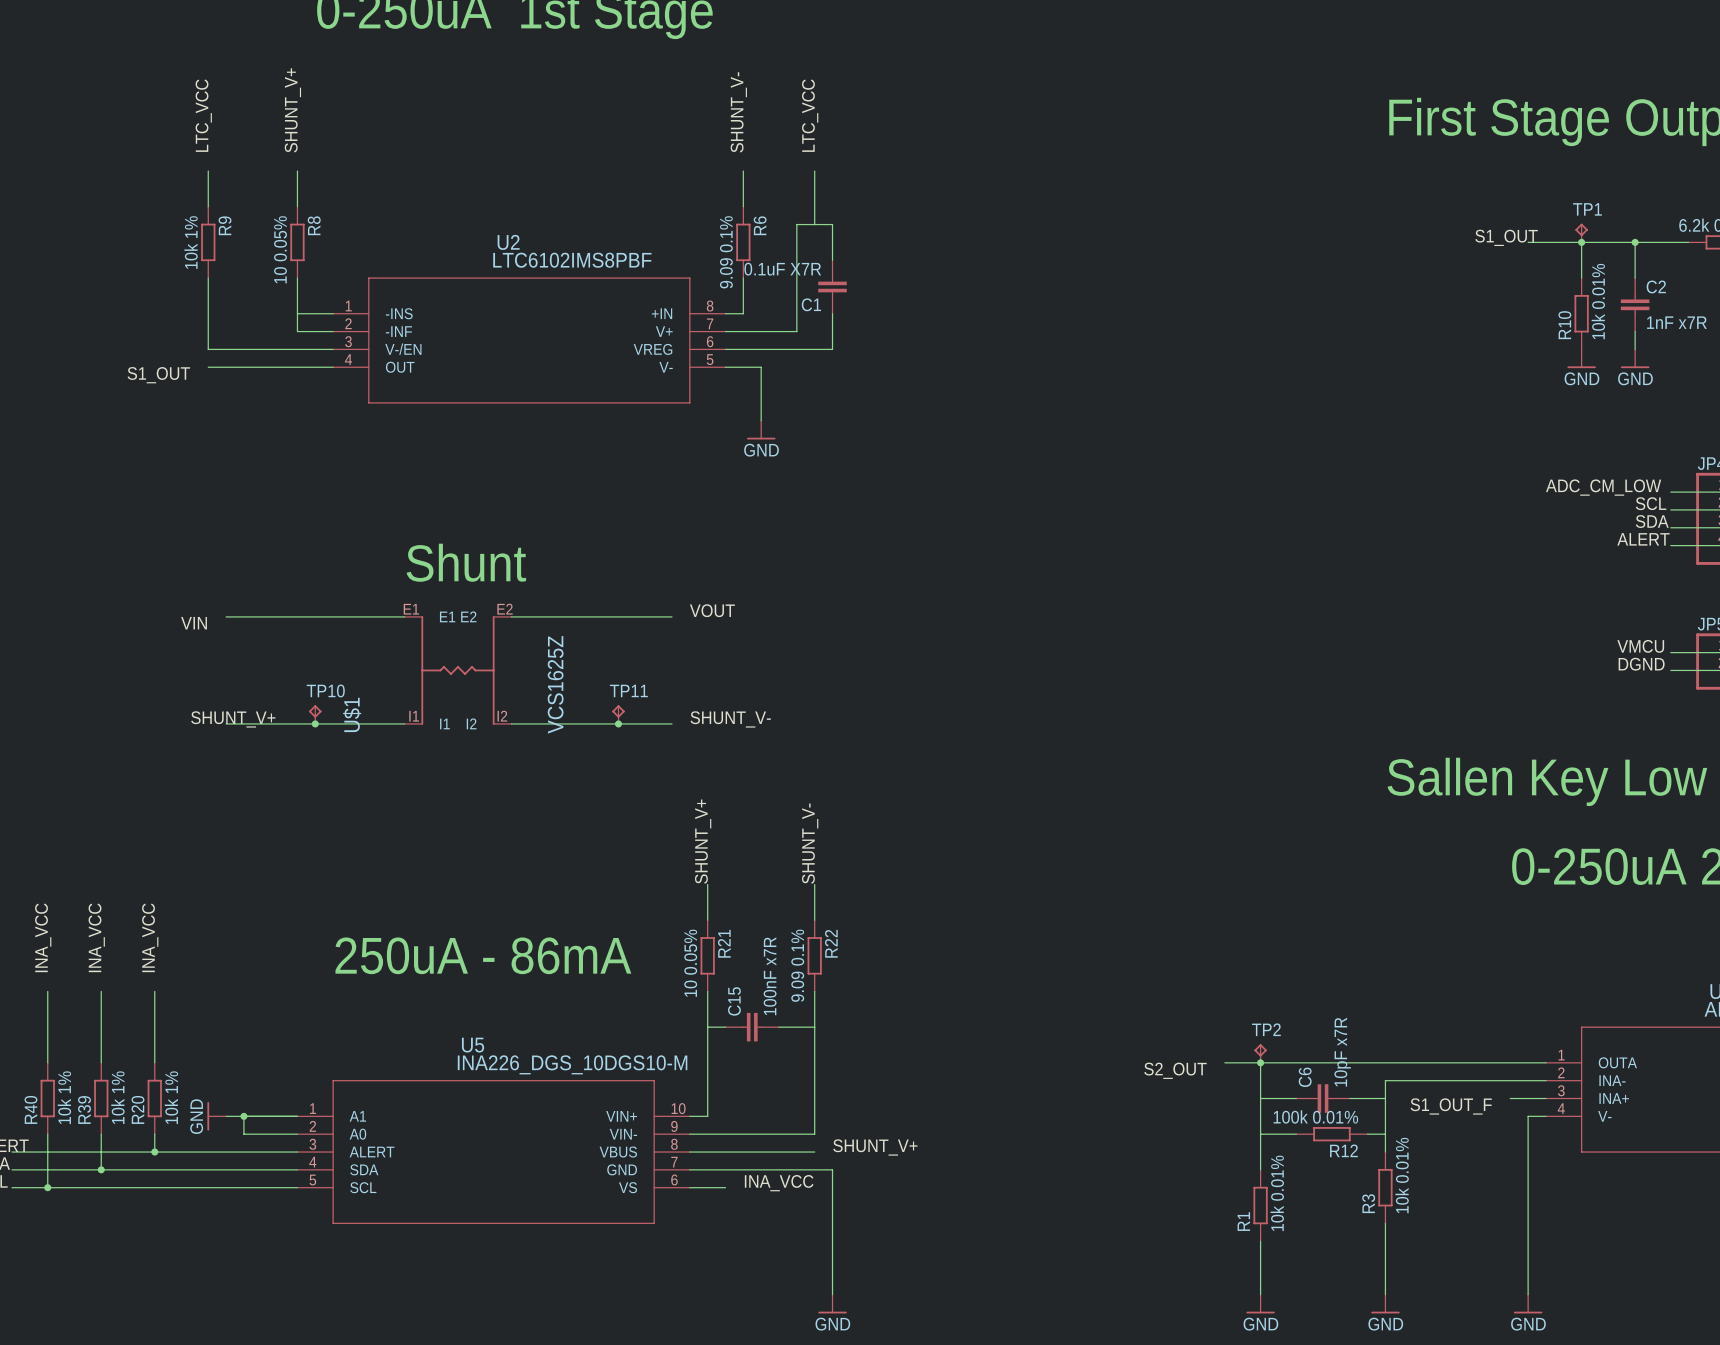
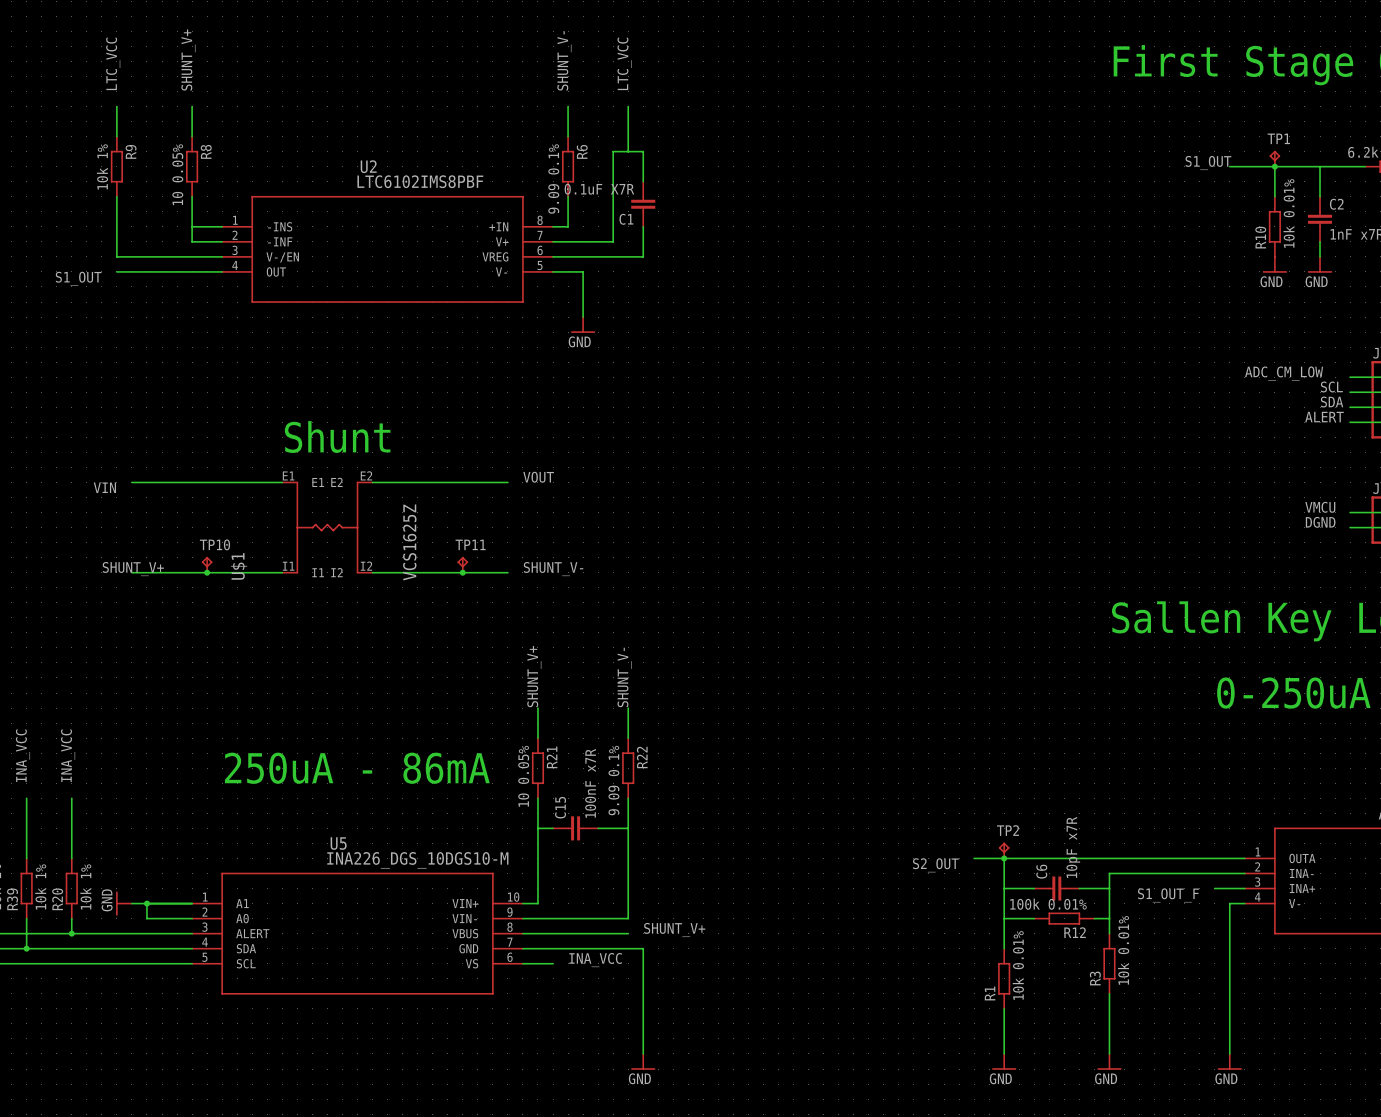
junction: (1635, 242) -> none

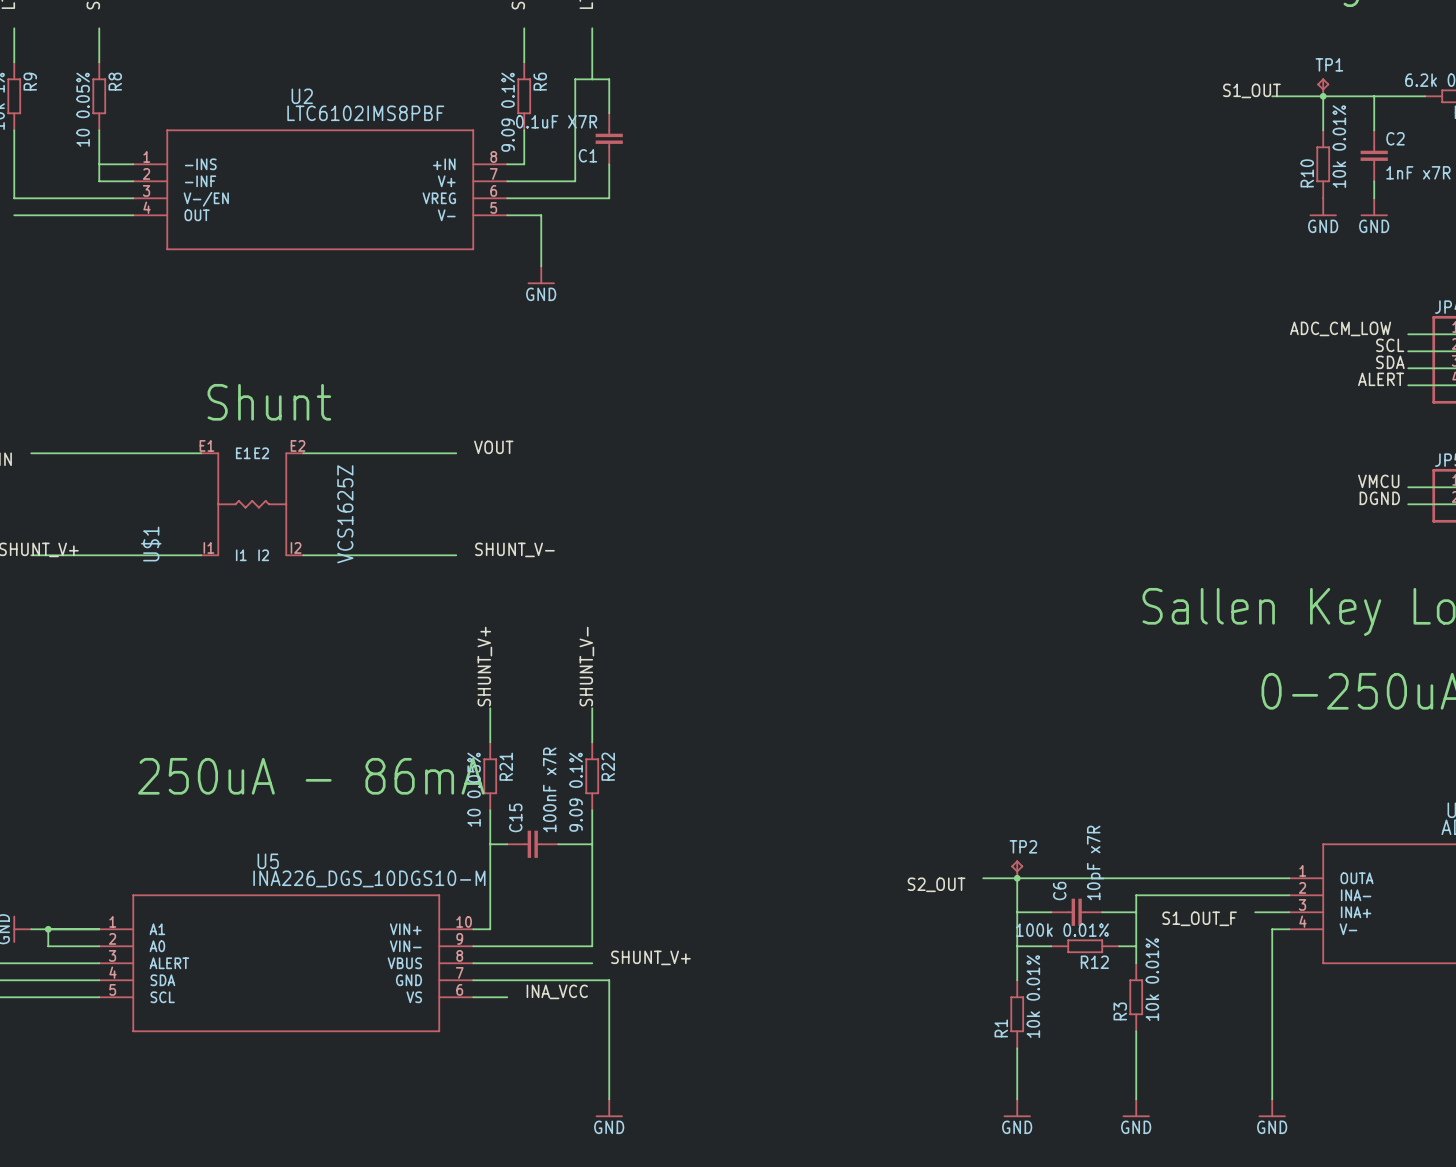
TP10: (207, 564) -> none
TP11: (462, 564) -> none
junction: (207, 572) -> none
junction: (462, 572) -> none

